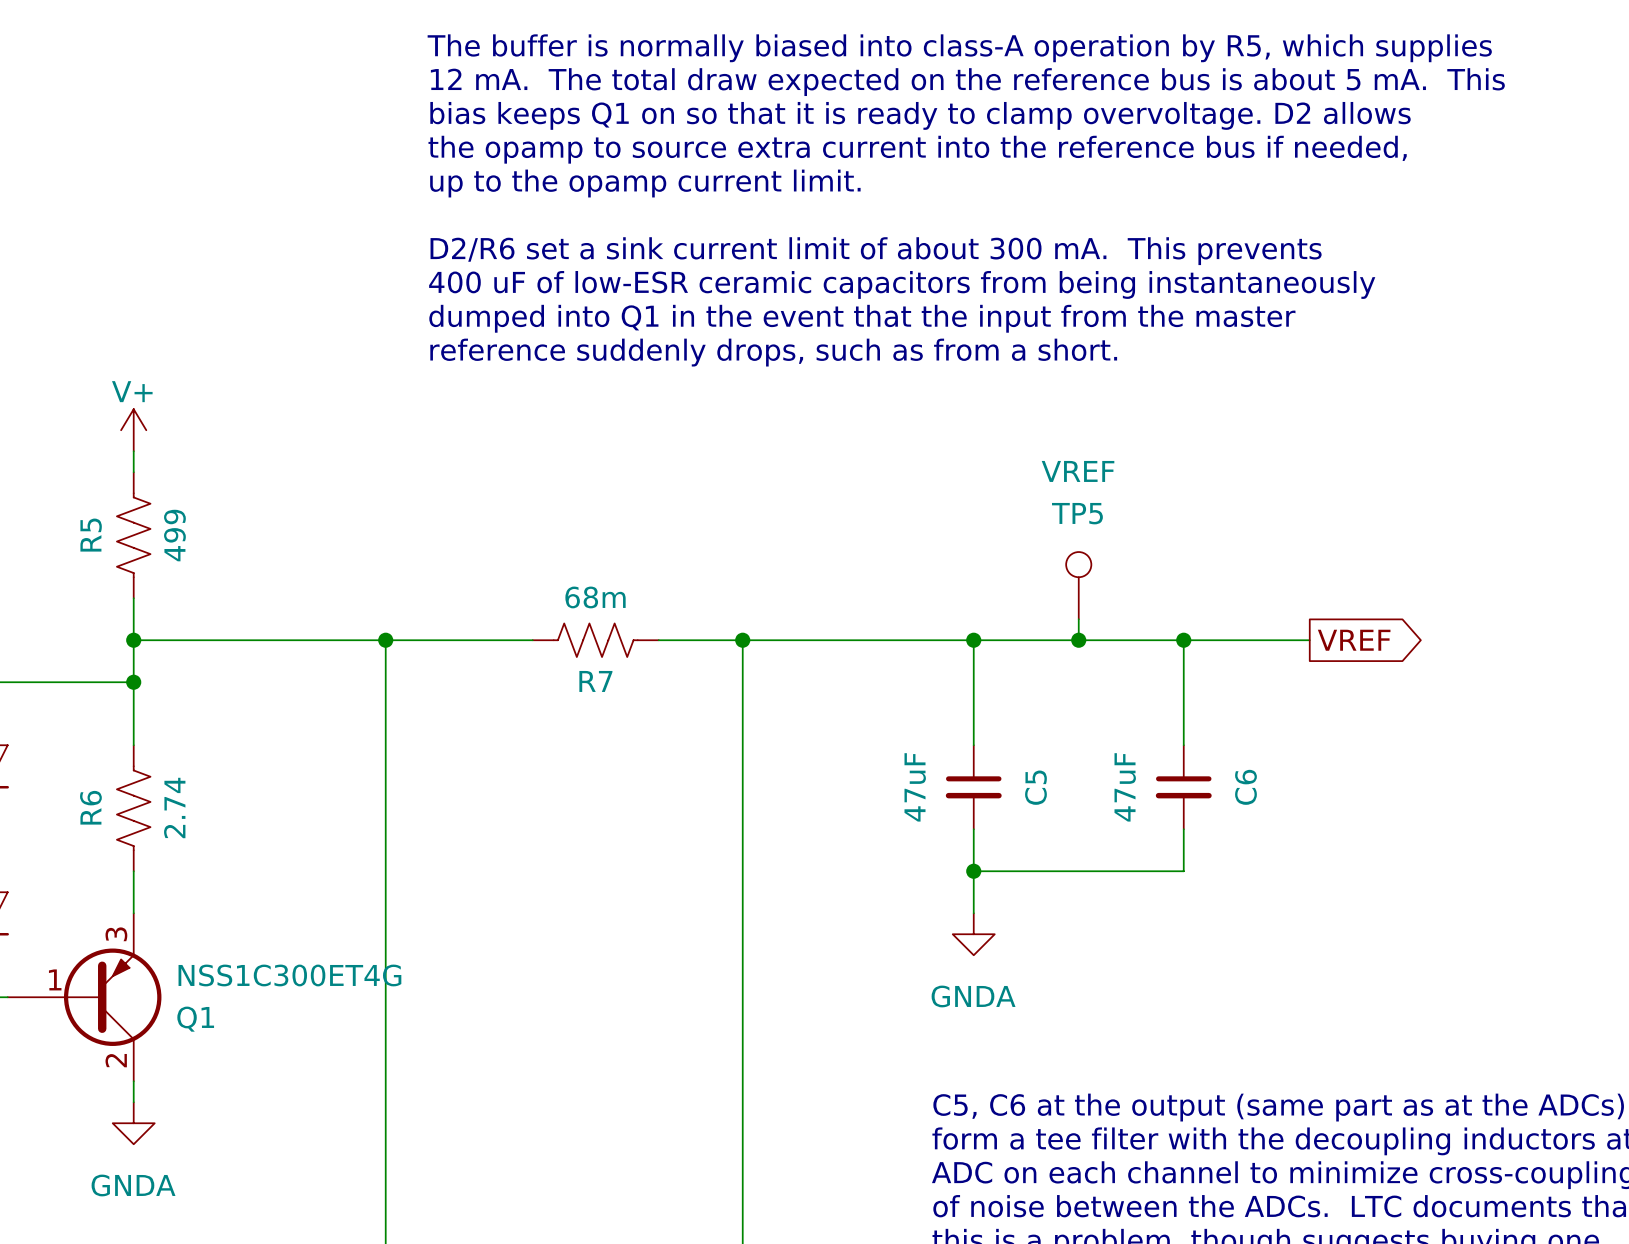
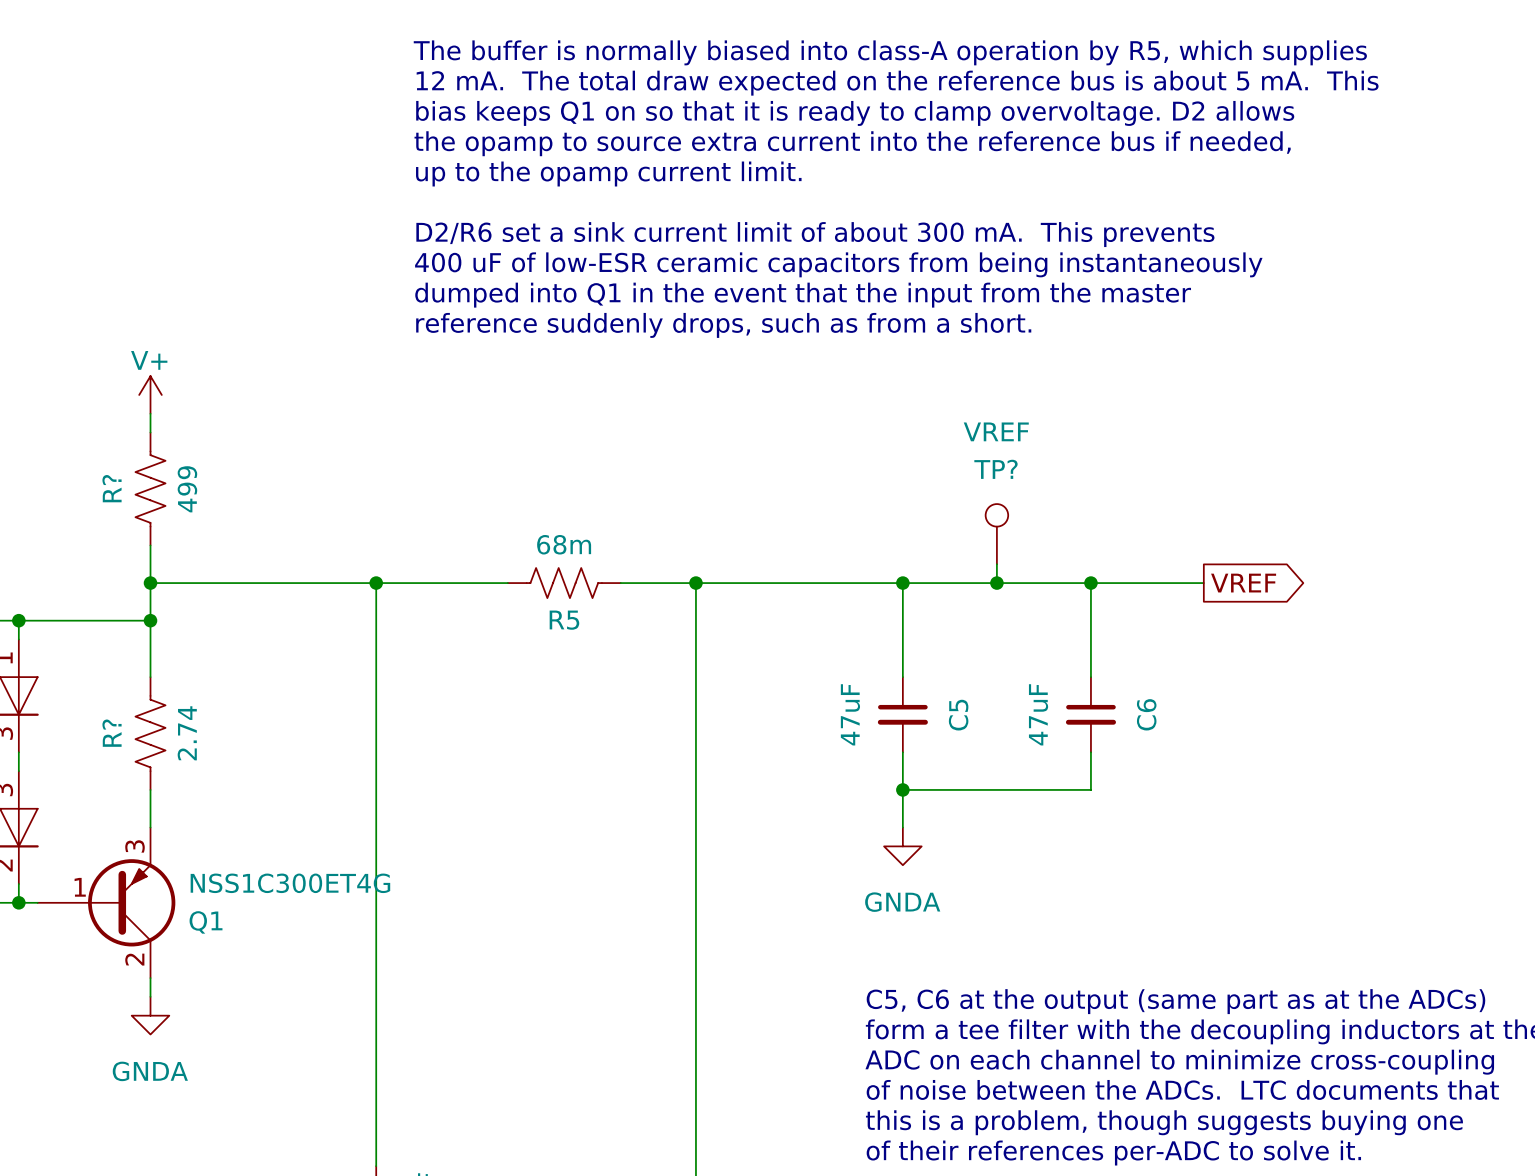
TP5 name: TP5 (1077, 513) -> TP? (995, 469)
R5 name: R5 (91, 535) -> R? (112, 488)
R7 name: R7 (595, 681) -> R5 (564, 620)
R6 name: R6 (90, 807) -> R? (112, 733)

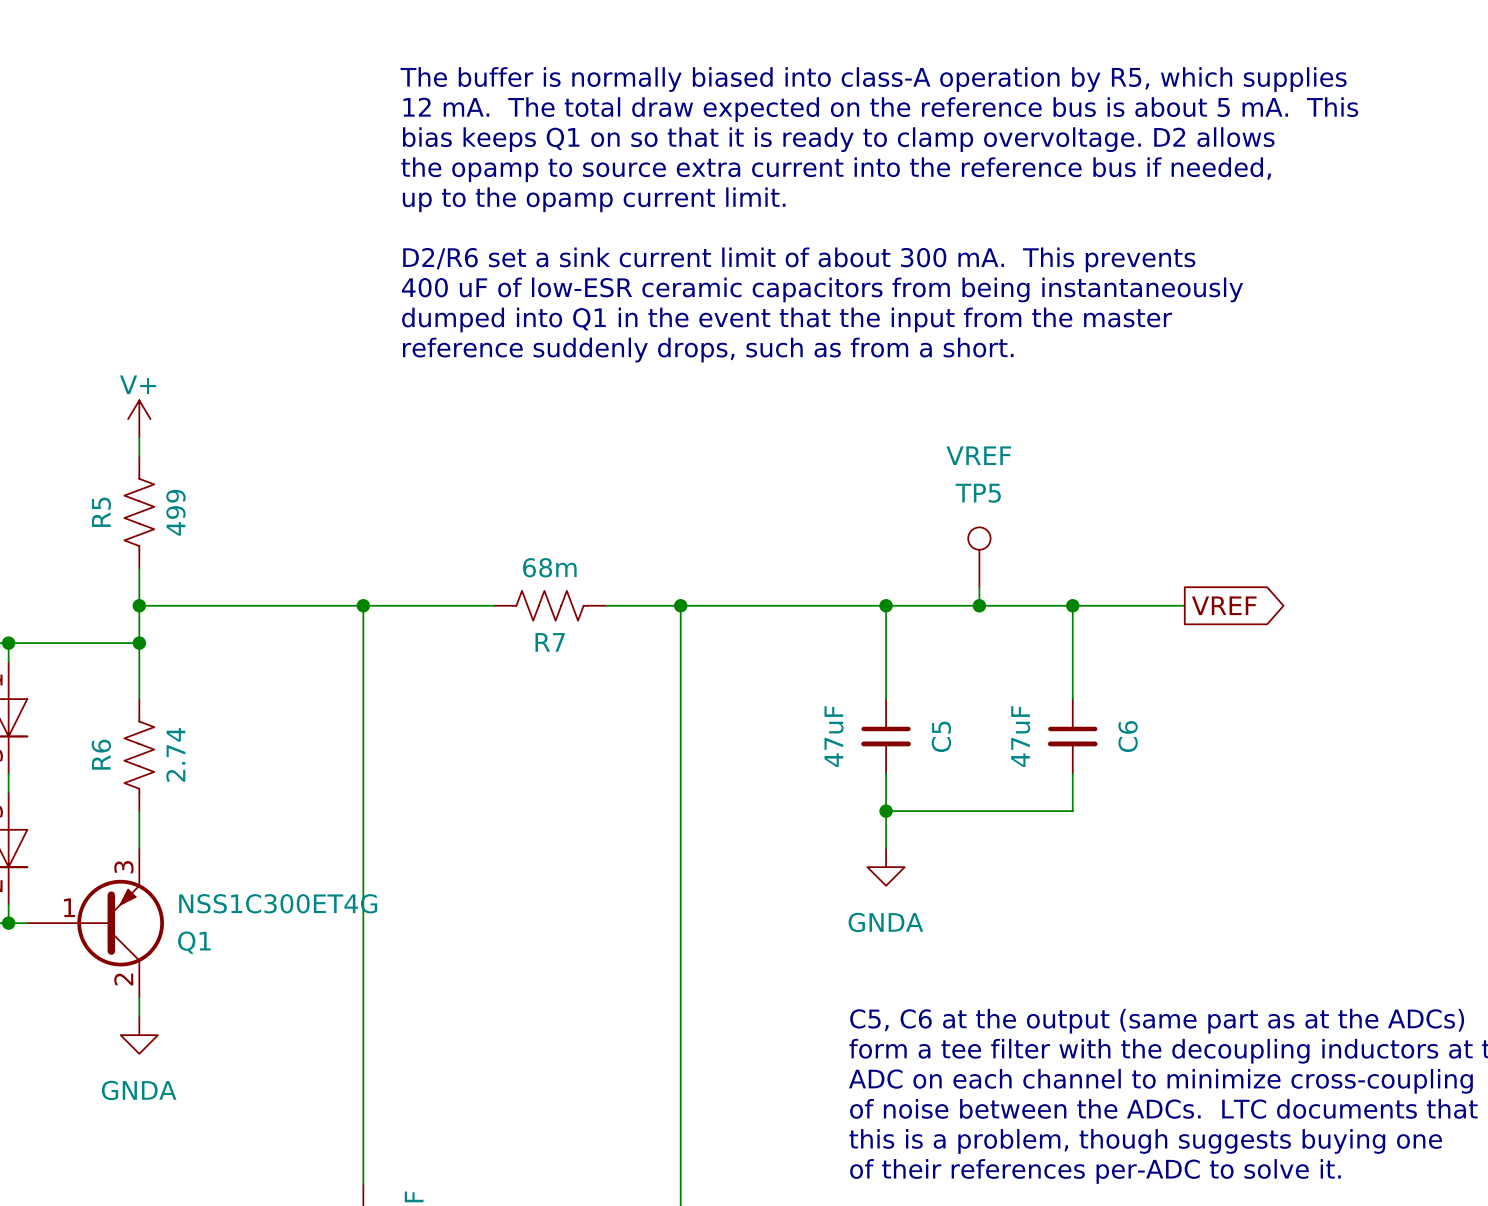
TP? name: TP? (995, 469) -> TP5 (978, 493)
R? name: R? (112, 488) -> R5 (101, 512)
R5 name: R5 (564, 620) -> R7 (550, 642)
R? name: R? (112, 733) -> R6 (101, 754)

